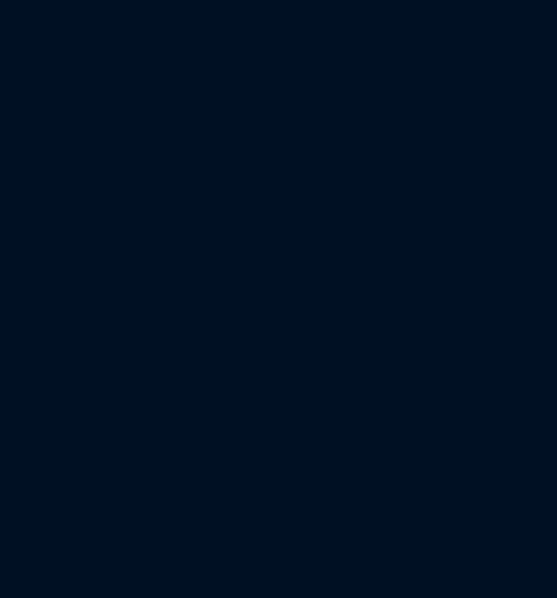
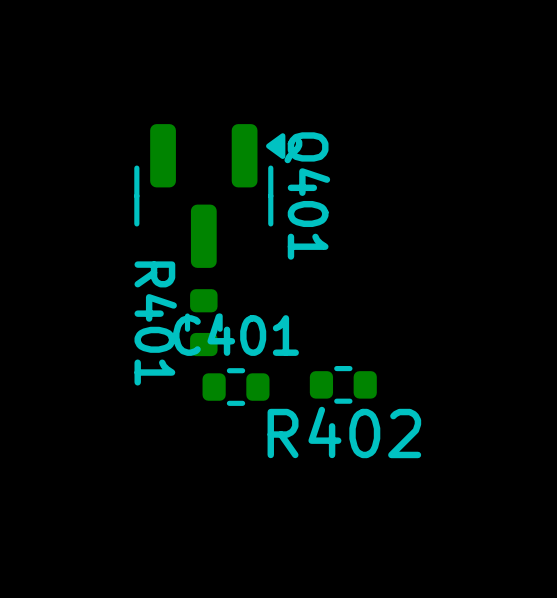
Q401: none -> (209, 196)
R401: none -> (203, 322)
R402: none -> (343, 384)
C401: none -> (236, 387)

